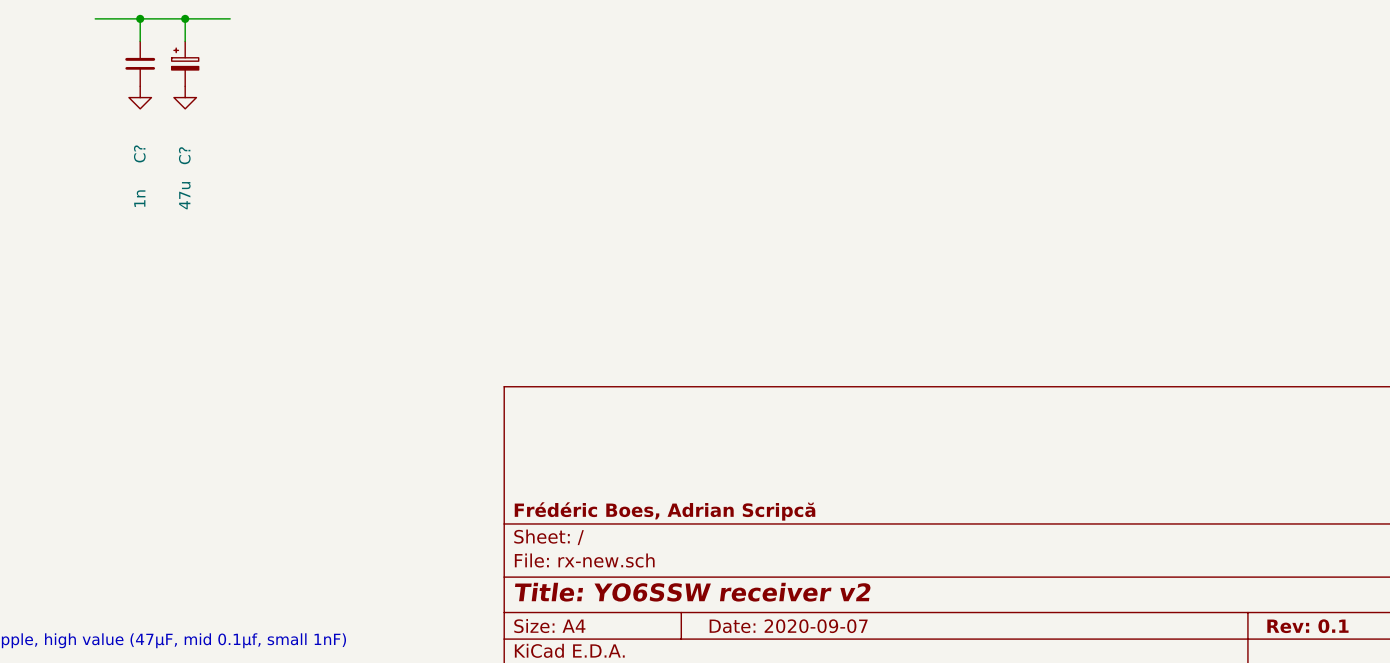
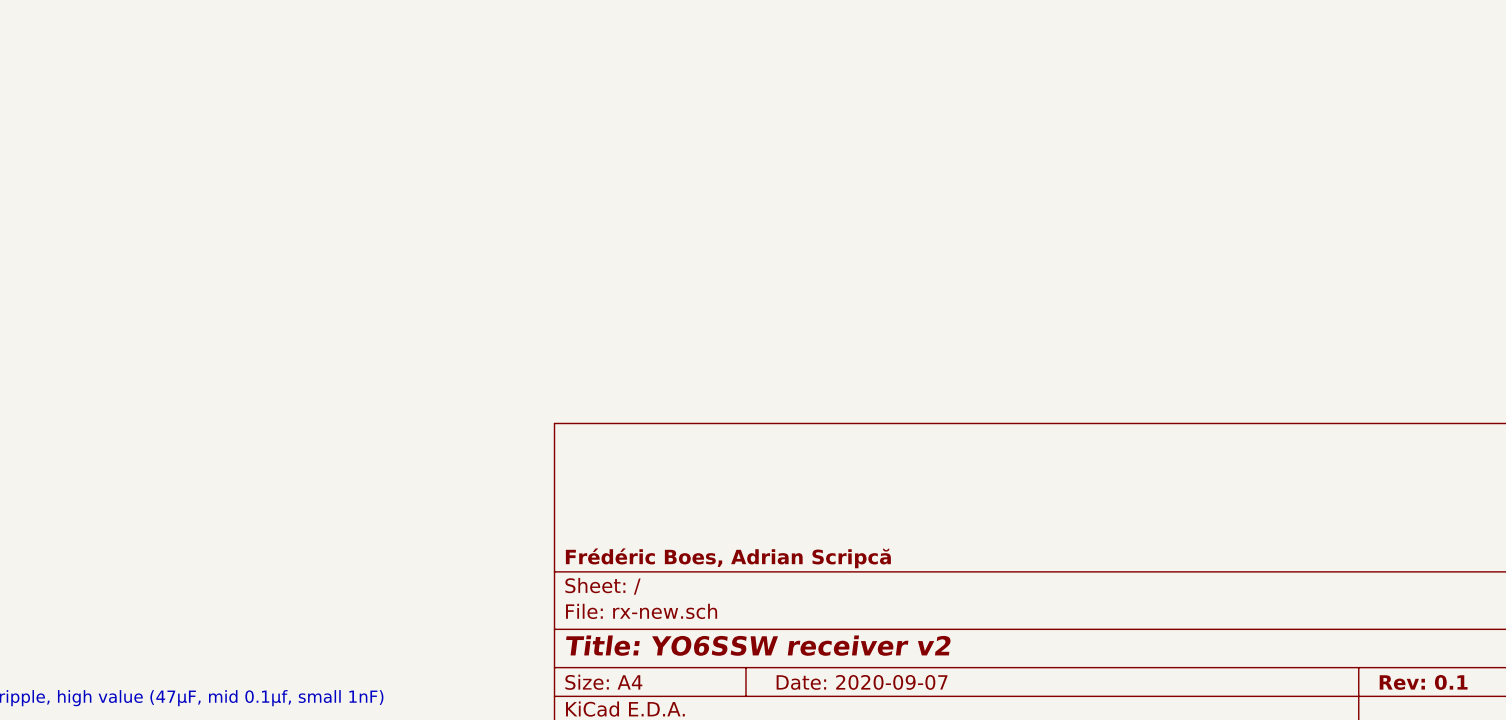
wire: (95, 18) (230, 18) -> none
wire: (140, 18) (140, 41) -> none
junction: (140, 18) -> none
wire: (185, 18) (185, 41) -> none
junction: (185, 18) -> none
C?: 1n (140, 63) -> none
C?: 47u (185, 63) -> none
power symbol: (140, 97) -> none
power symbol: (185, 97) -> none

